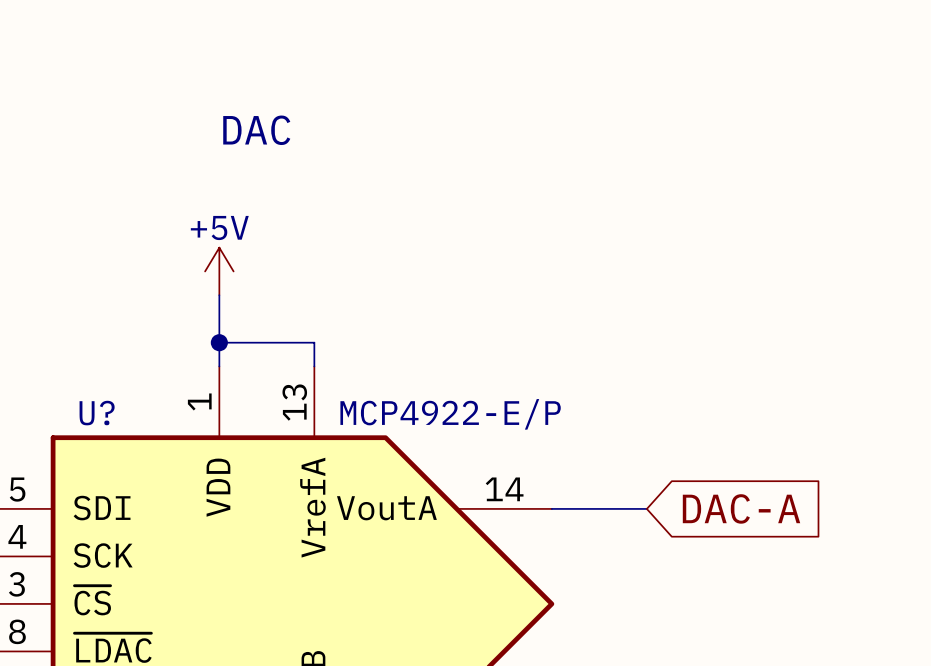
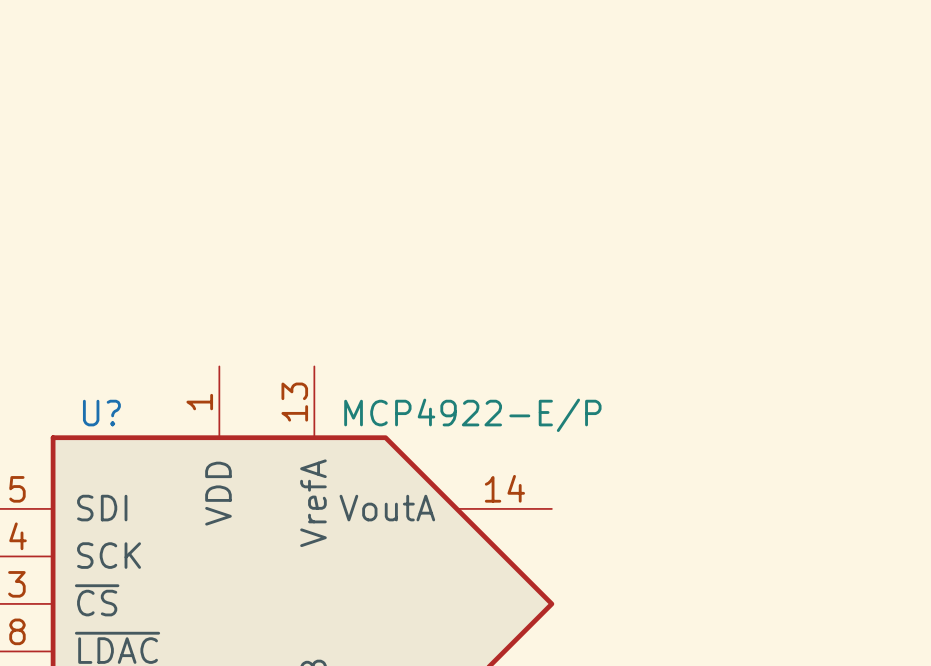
text: DAC (256, 130) -> none
power symbol: +5V (219, 271) -> none
wire: (219, 295) (219, 366) -> none
wire: (219, 342) (314, 342) (314, 366) -> none
junction: (219, 342) -> none
wire: (551, 508) (646, 508) -> none
global label: DAC-A (741, 508) -> none

